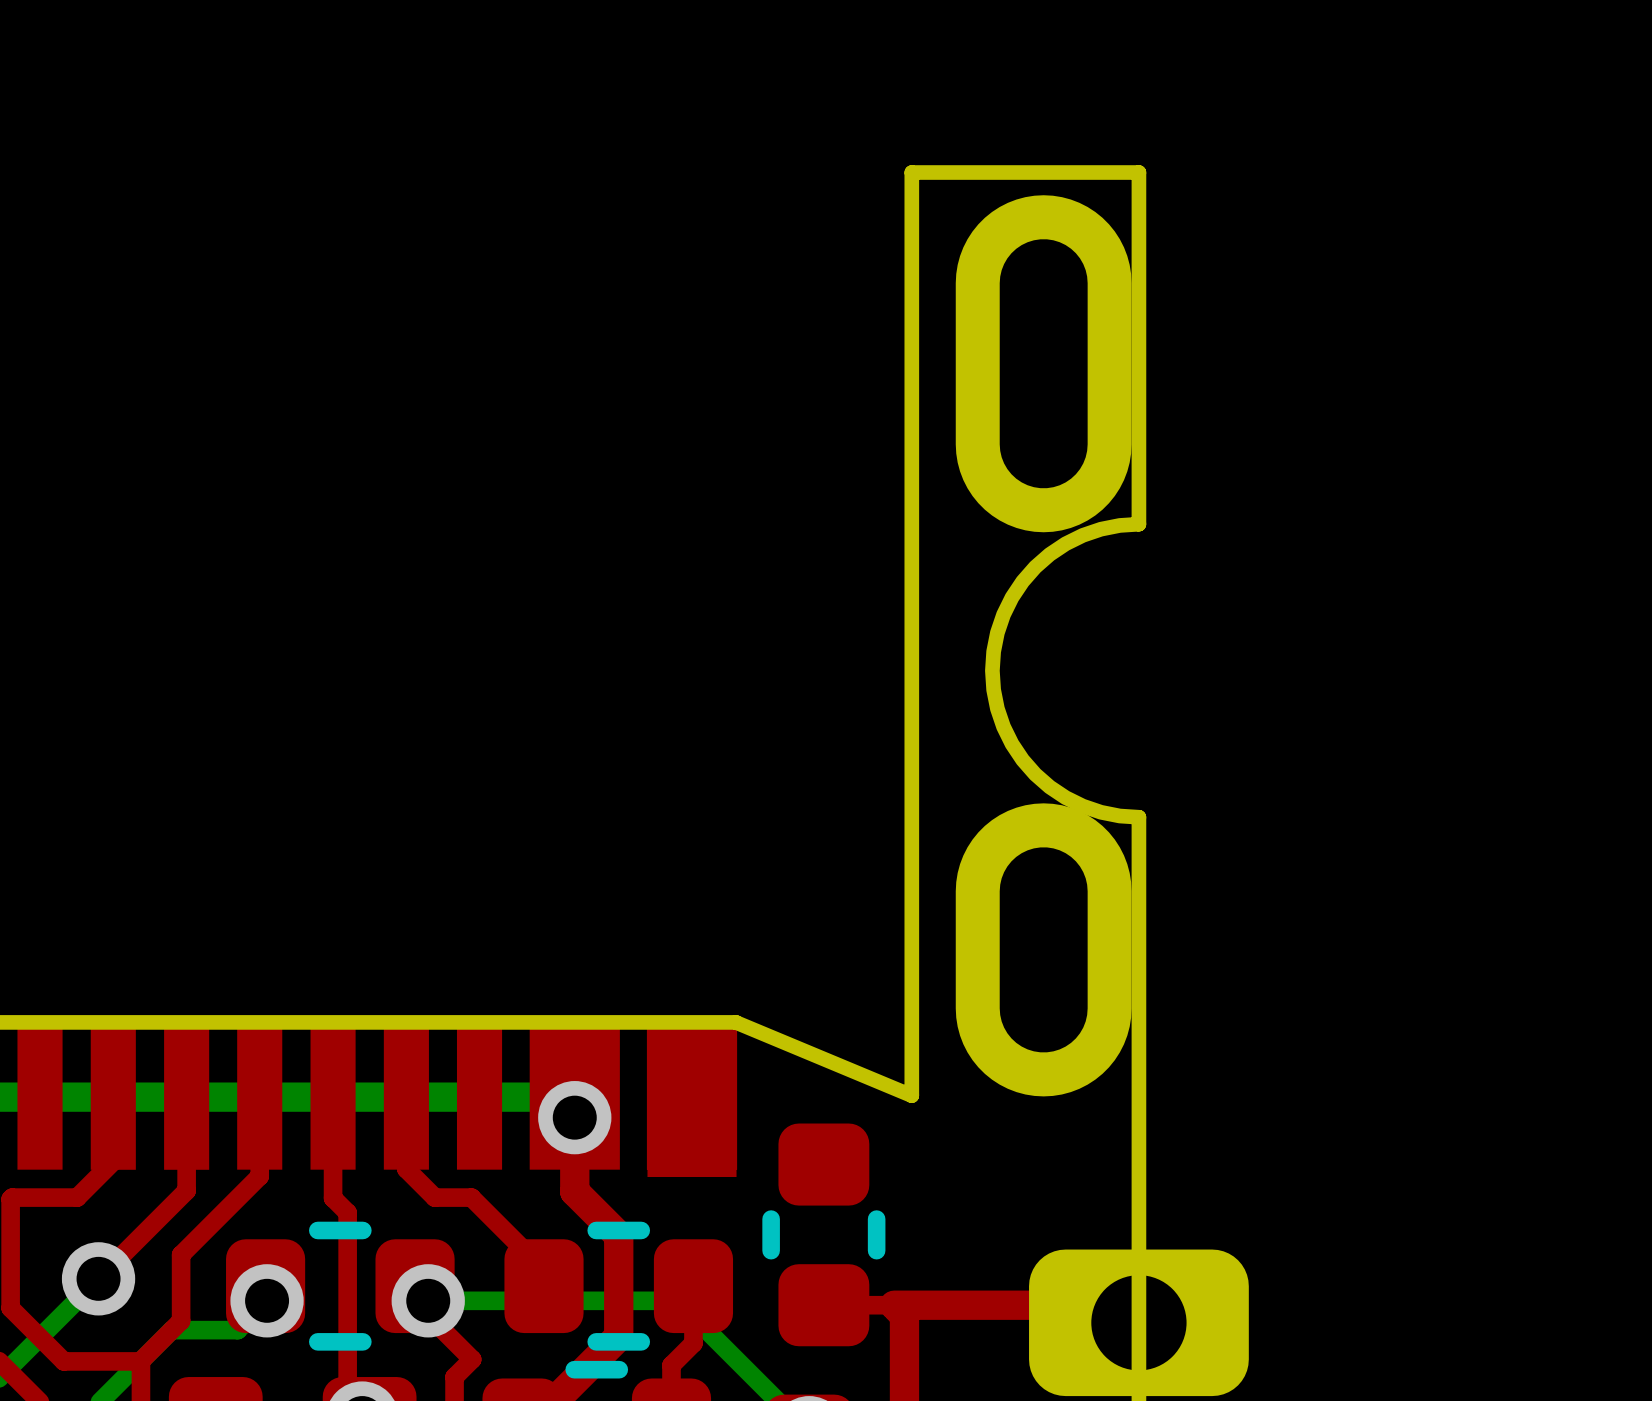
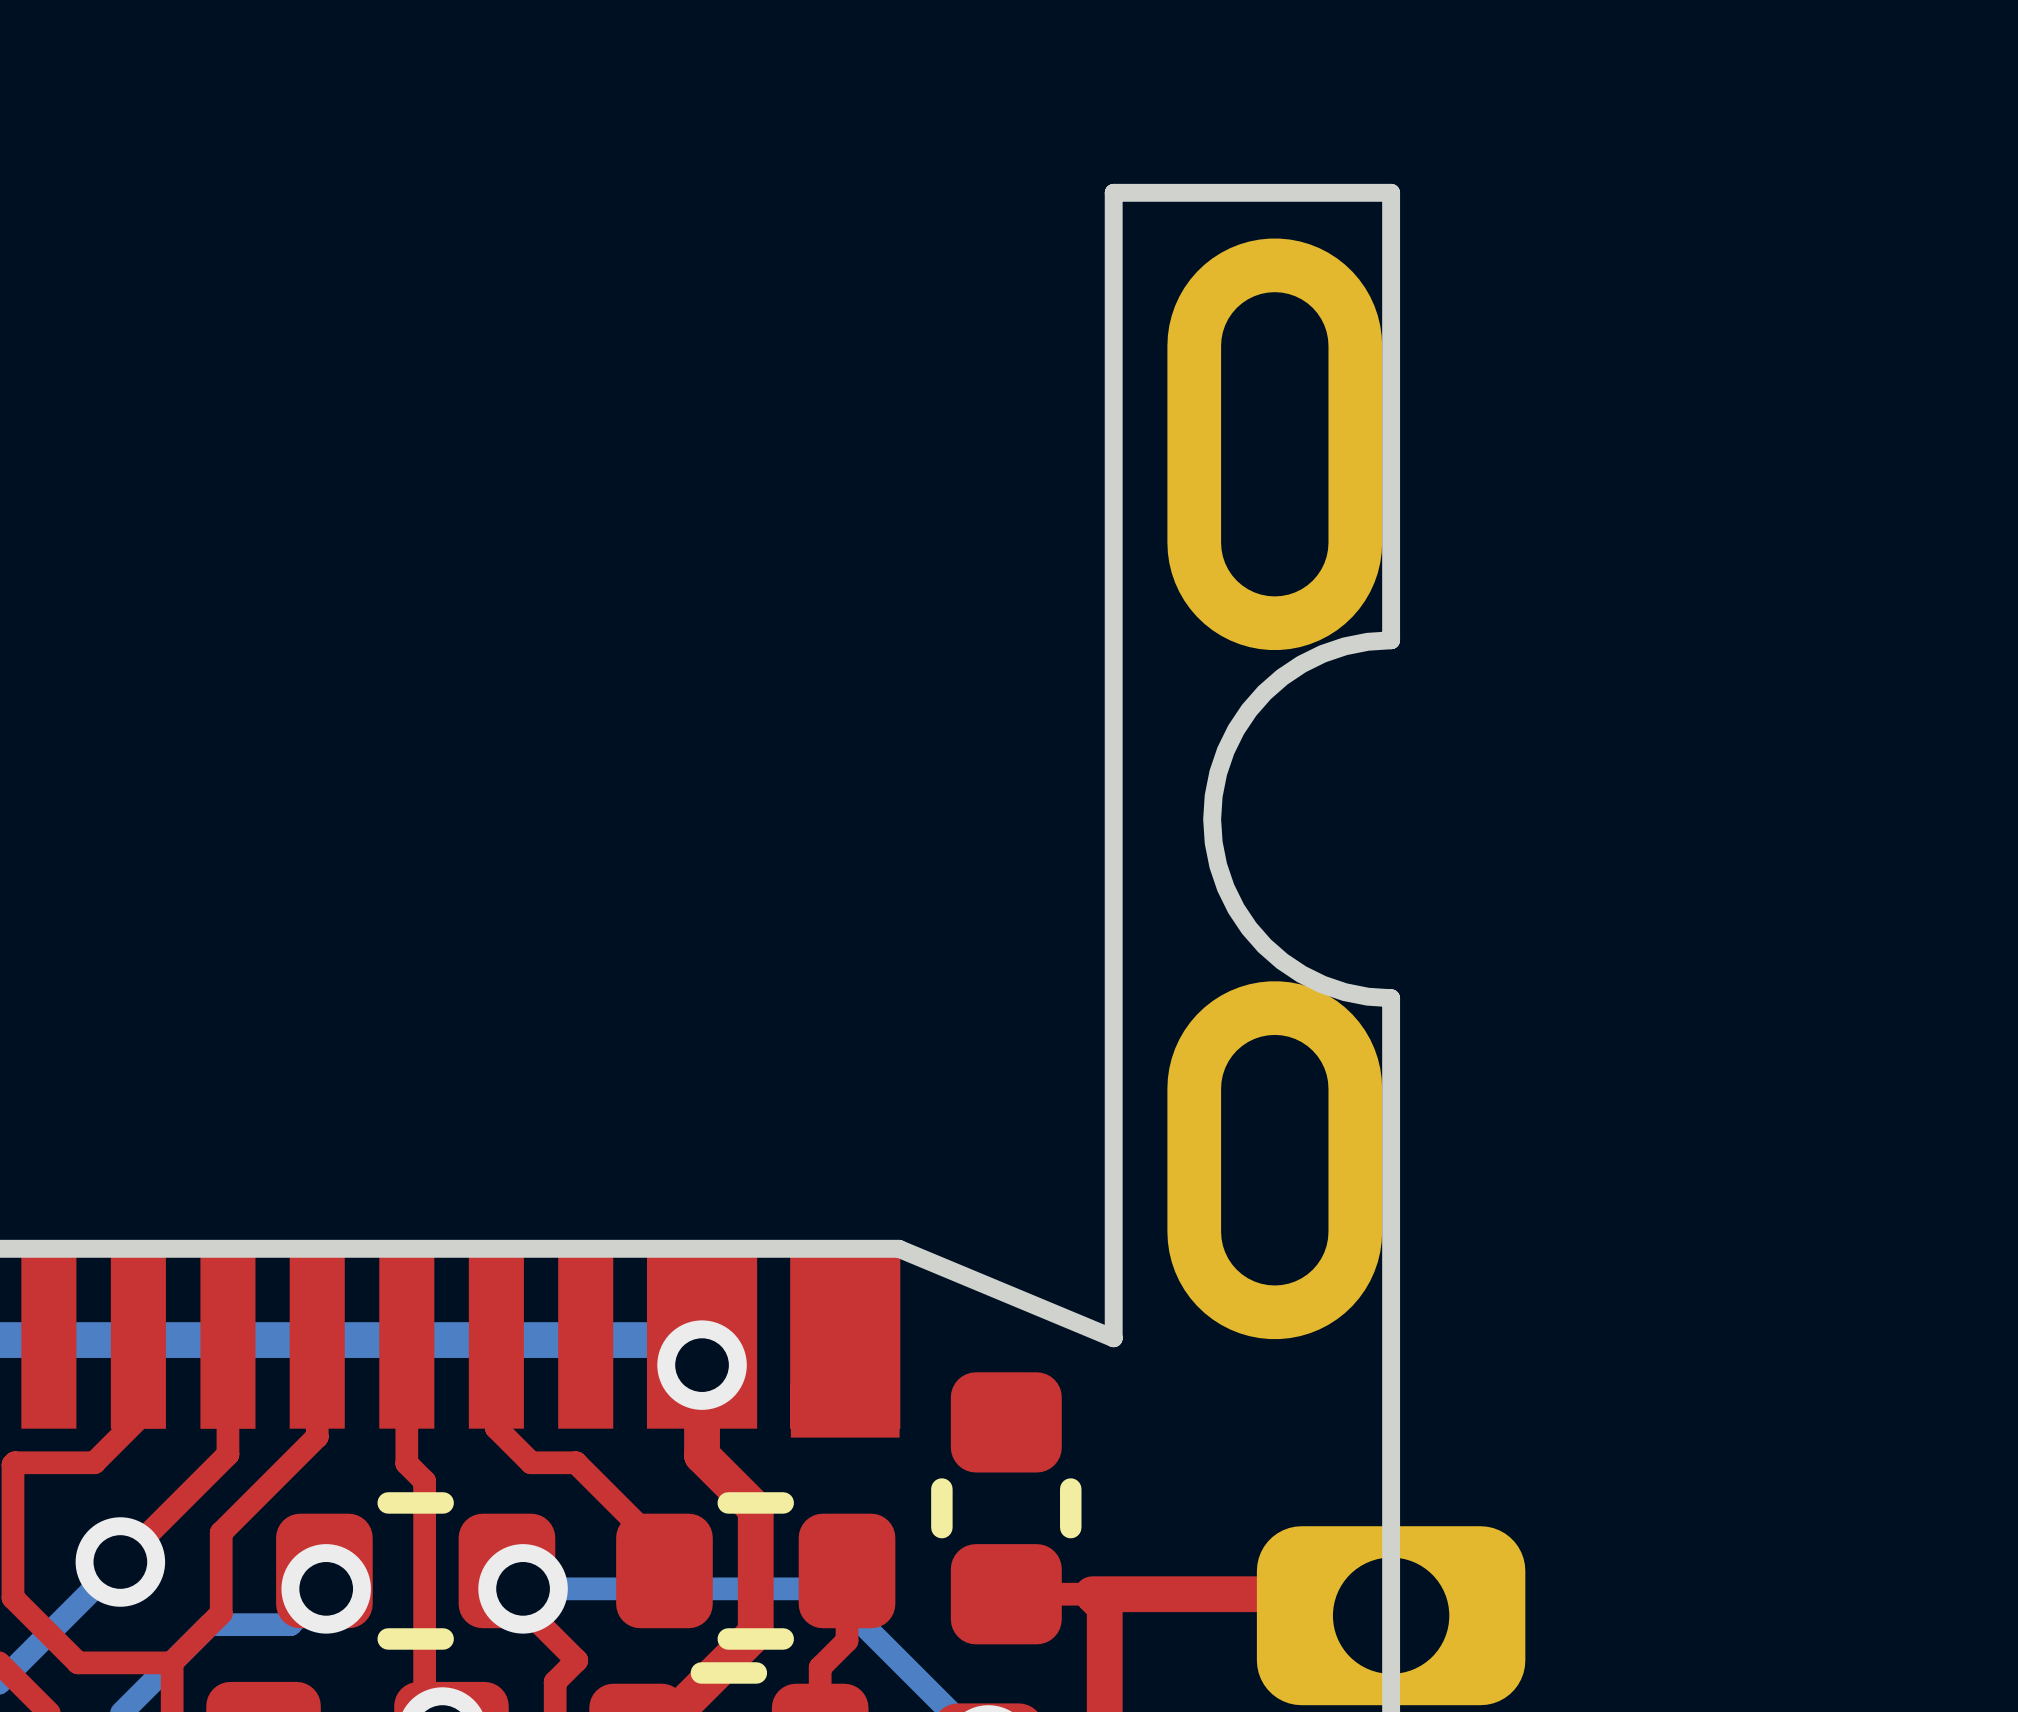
board edge: (911, 172) (1138, 172) -> (1113, 210) (1113, 192) (1391, 192) (1391, 210)

